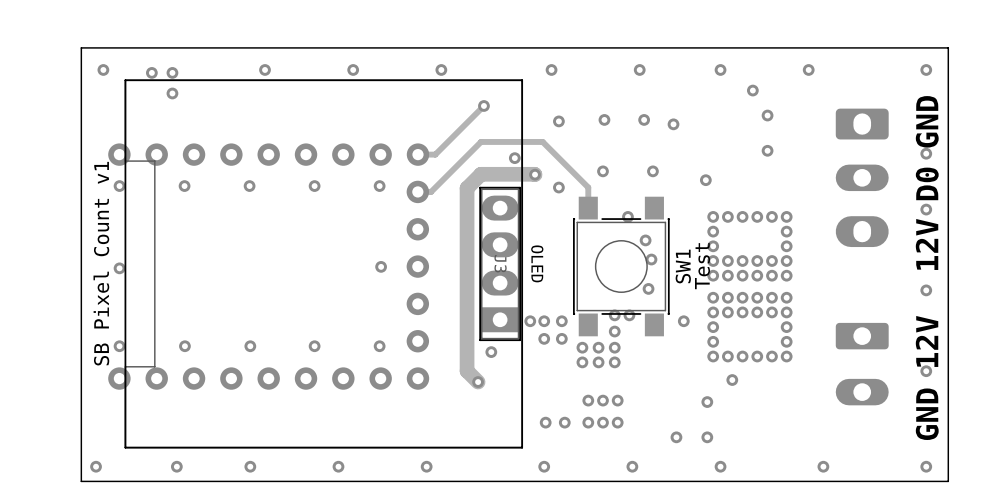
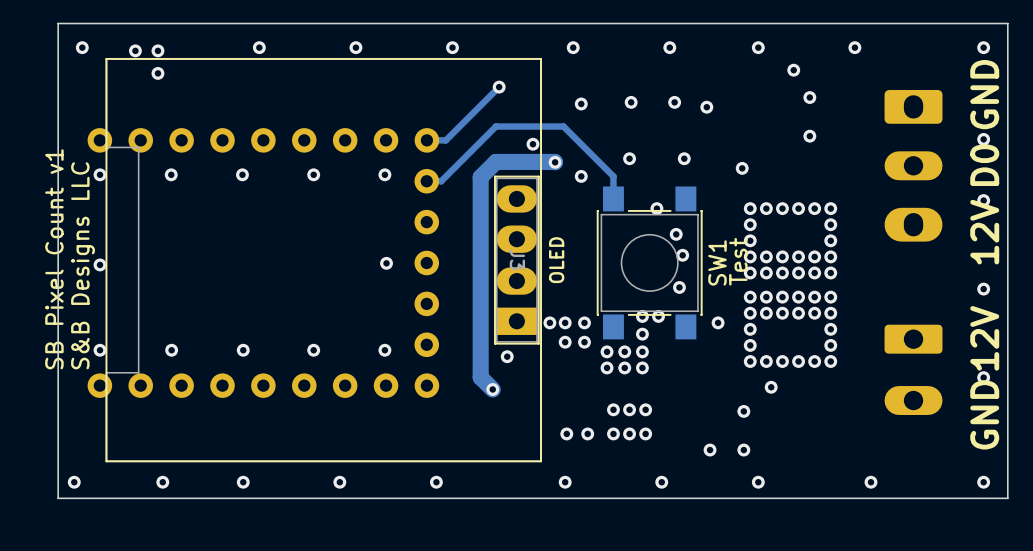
text: none -> SB Pixel Count v1 (54, 259)
text: SB Pixel Count v1 (101, 263) -> S&B Designs LLC (83, 265)
J3 value rotation: 0° (537, 263) -> 180° (556, 260)

